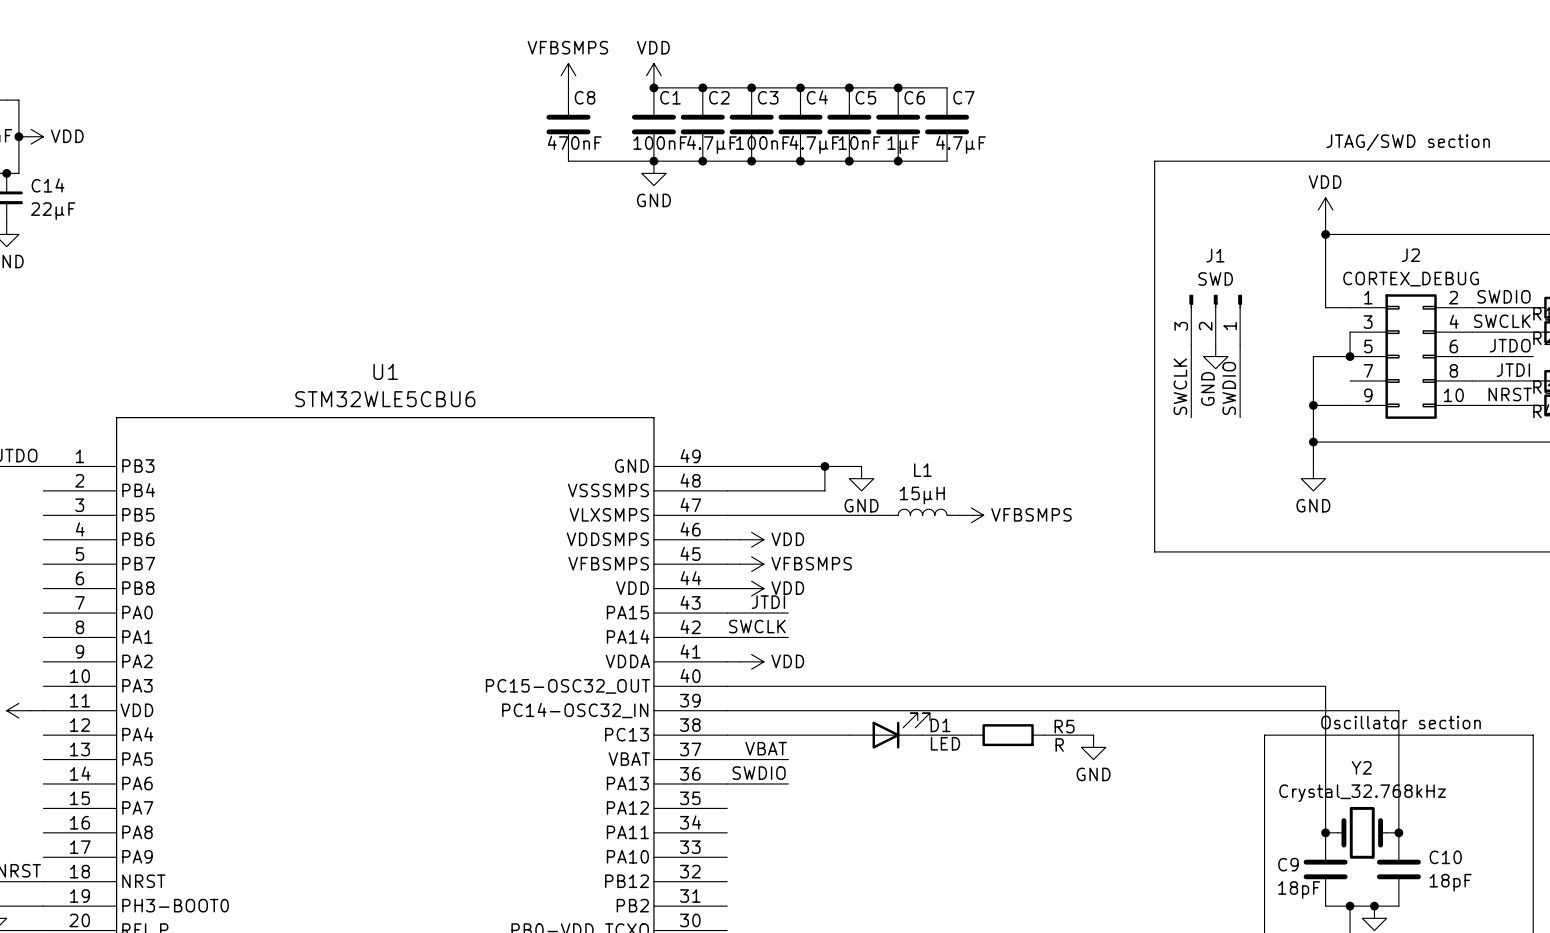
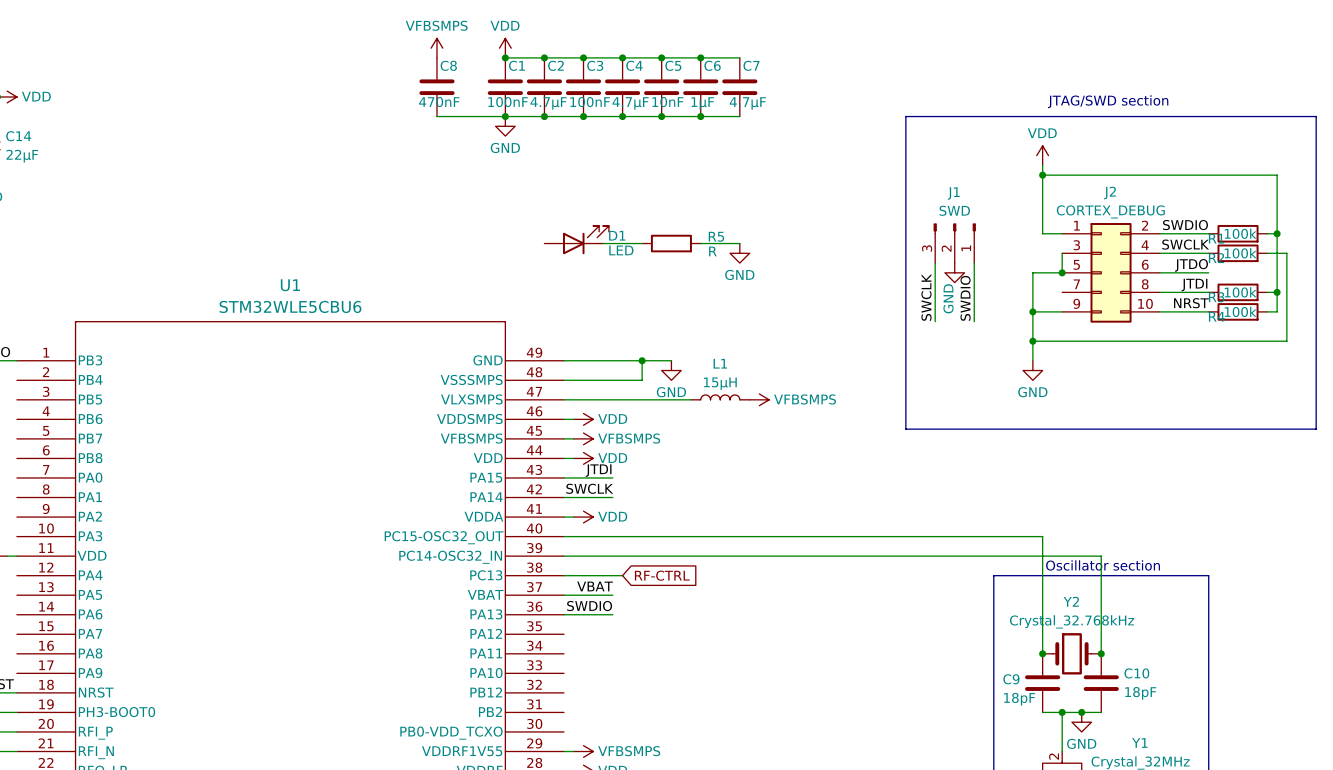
wire: none -> (603, 243) (642, 243)
wire: none -> (700, 243) (739, 243)
power symbol: none -> GND (739, 253)
D1 position: (889, 730) -> (576, 240)
wire: (800, 735) (849, 735) -> none
global label: none -> RF-CTRL (662, 575)
wire: (922, 735) (971, 735) -> none
R5 position: (1008, 735) -> (671, 243)
wire: (1044, 735) (1093, 735) -> none
power symbol: GND (1093, 747) -> none

